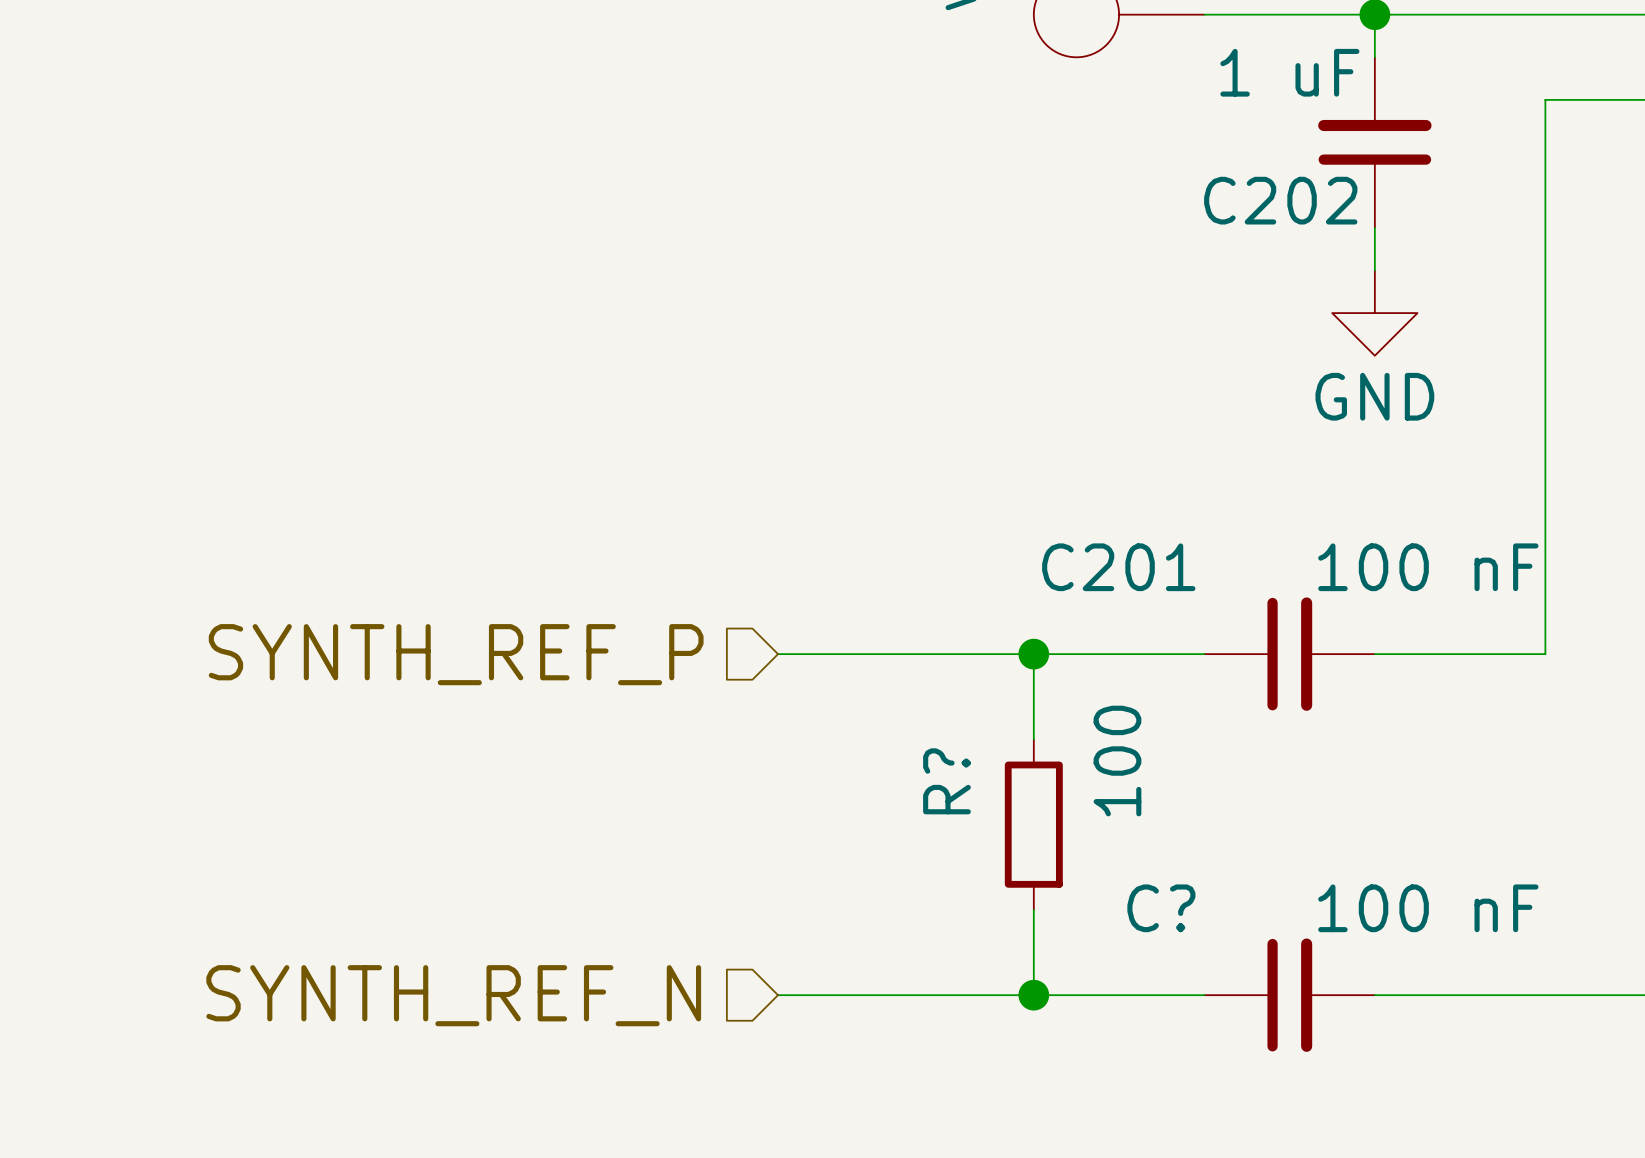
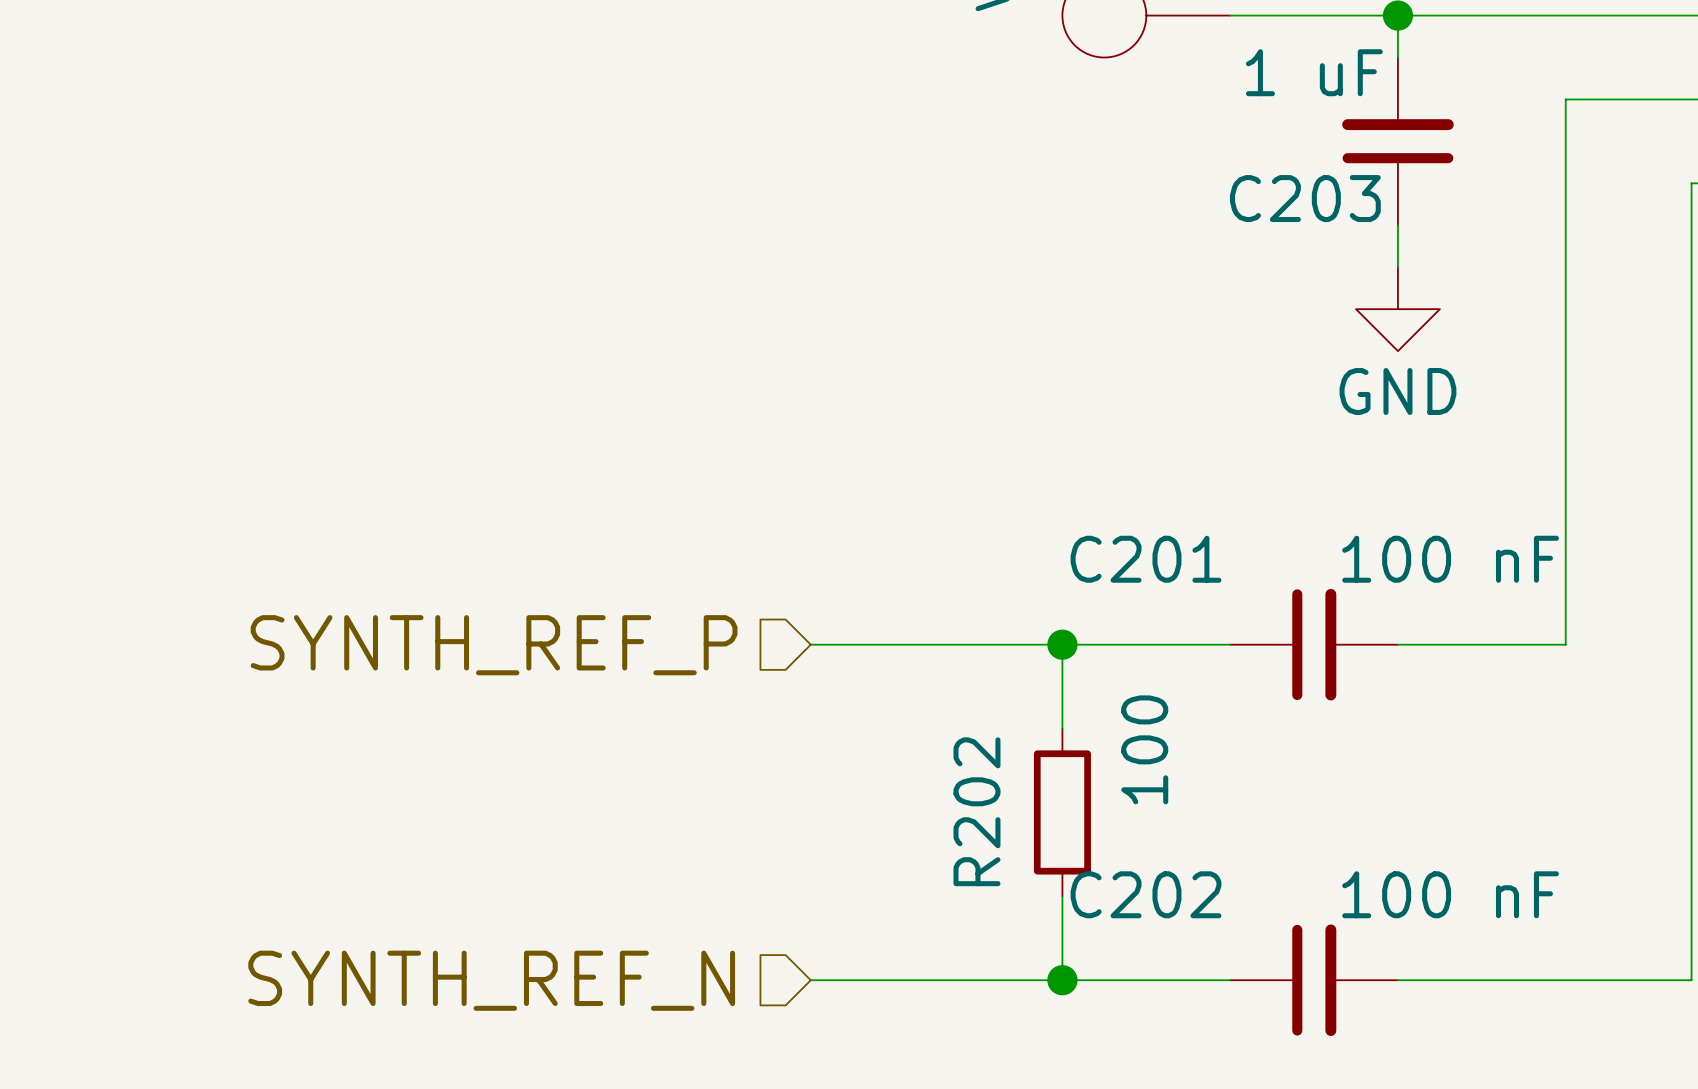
C202 name: C202 (1280, 200) -> C203 (1305, 198)
R? name: R? (946, 781) -> R202 (976, 811)
C? name: C? (1161, 908) -> C202 (1145, 894)

